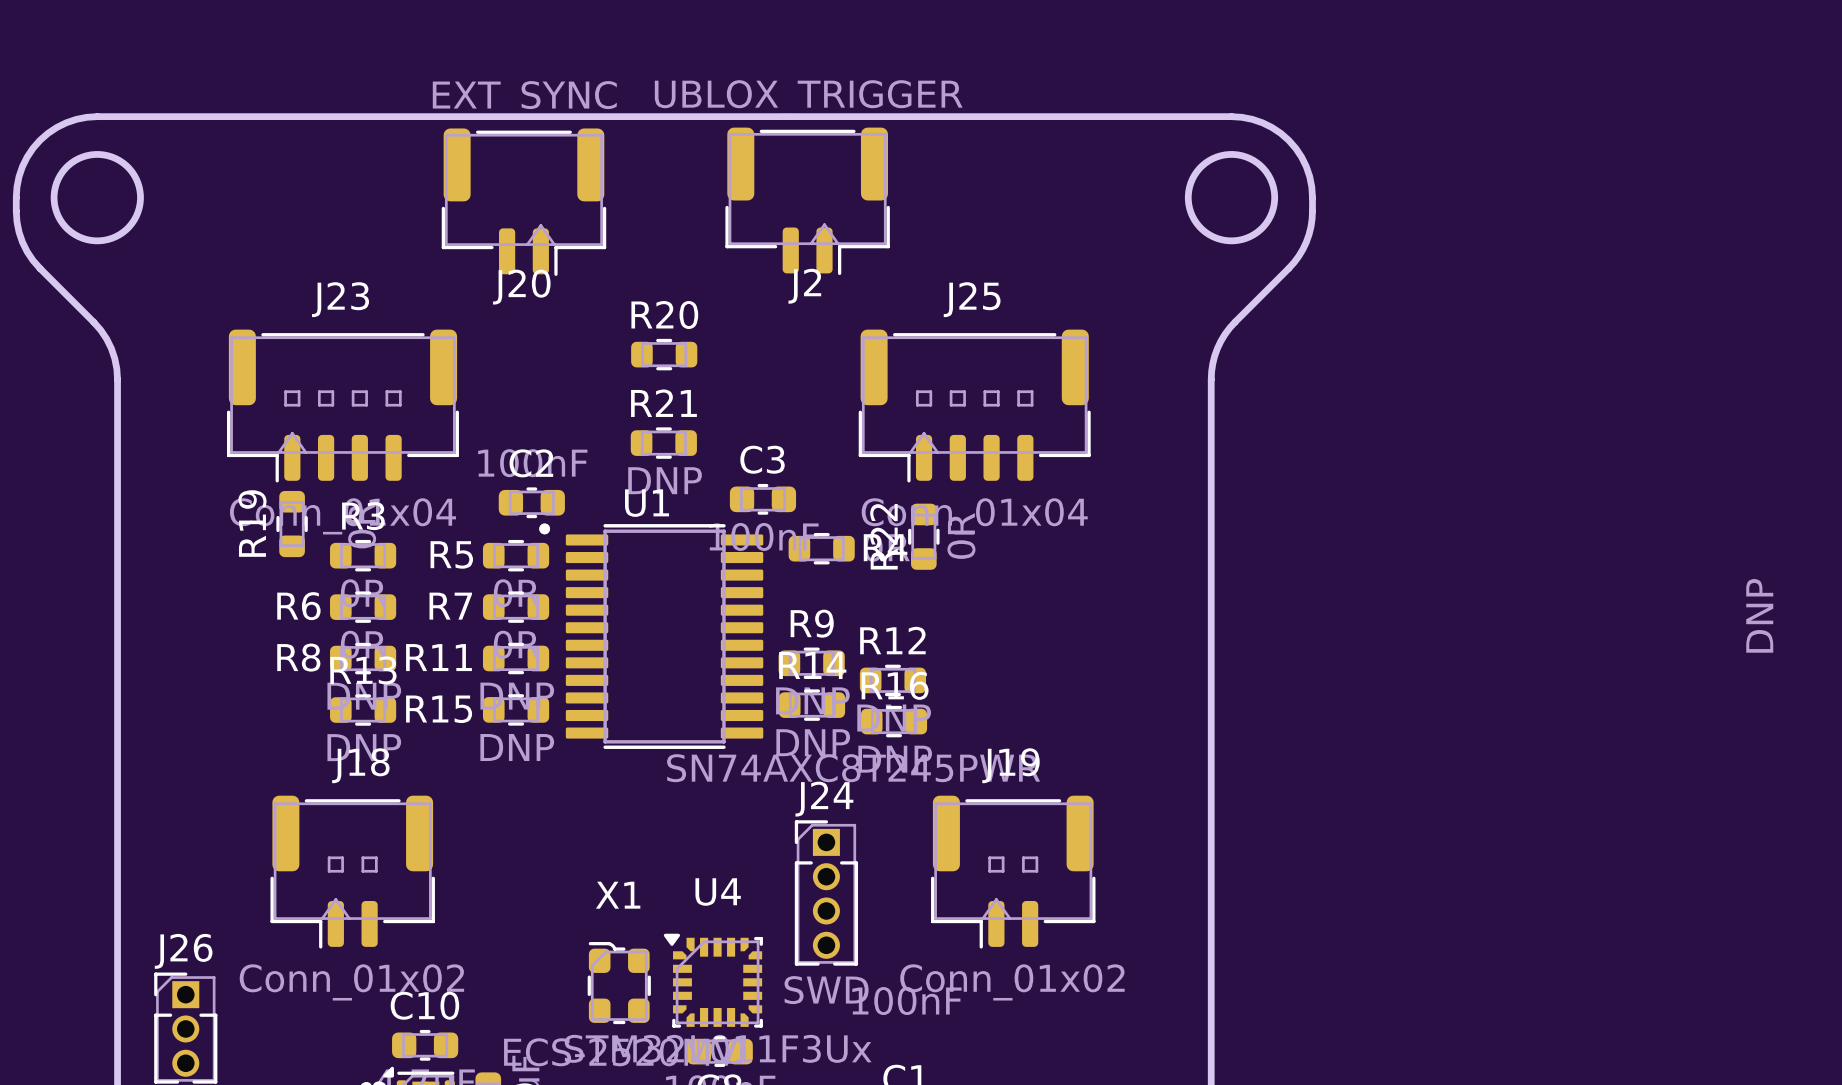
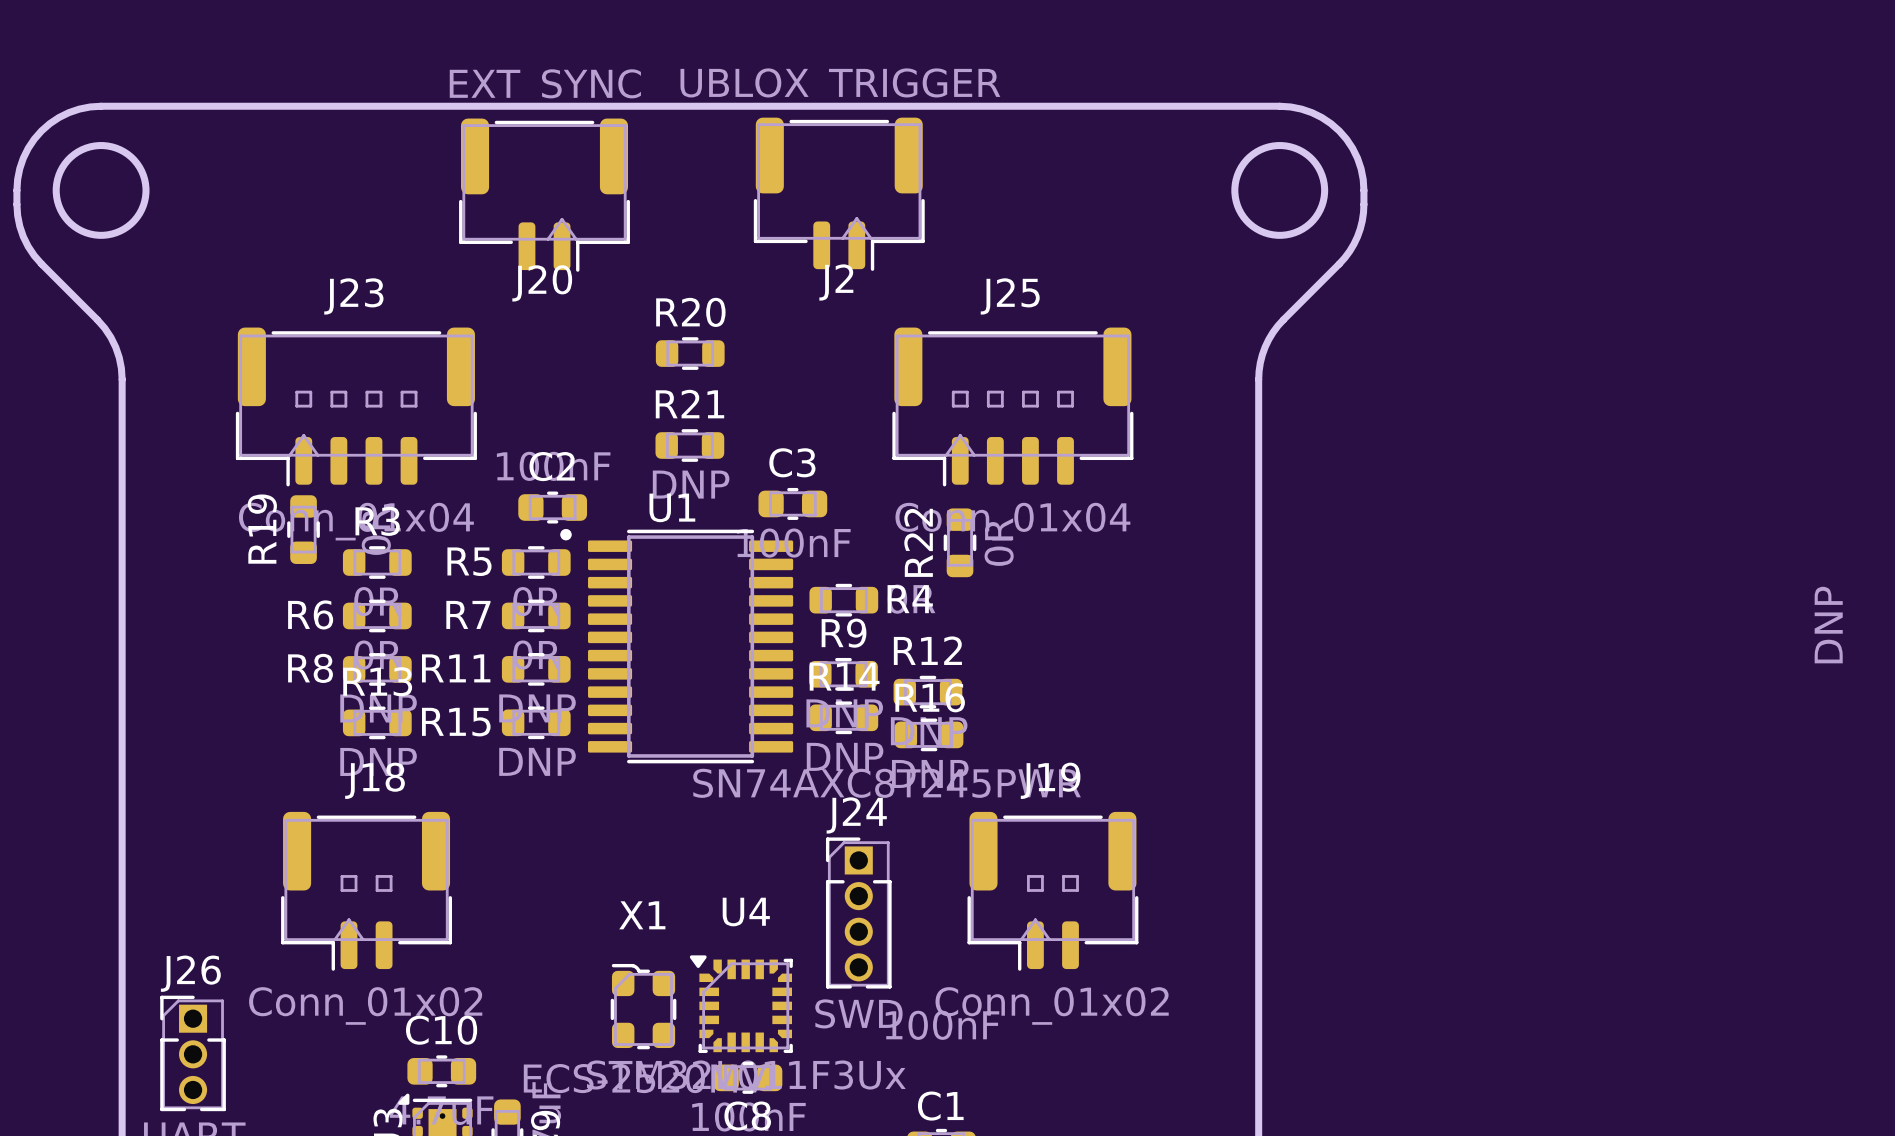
R4 position: (821, 548) -> (843, 600)

